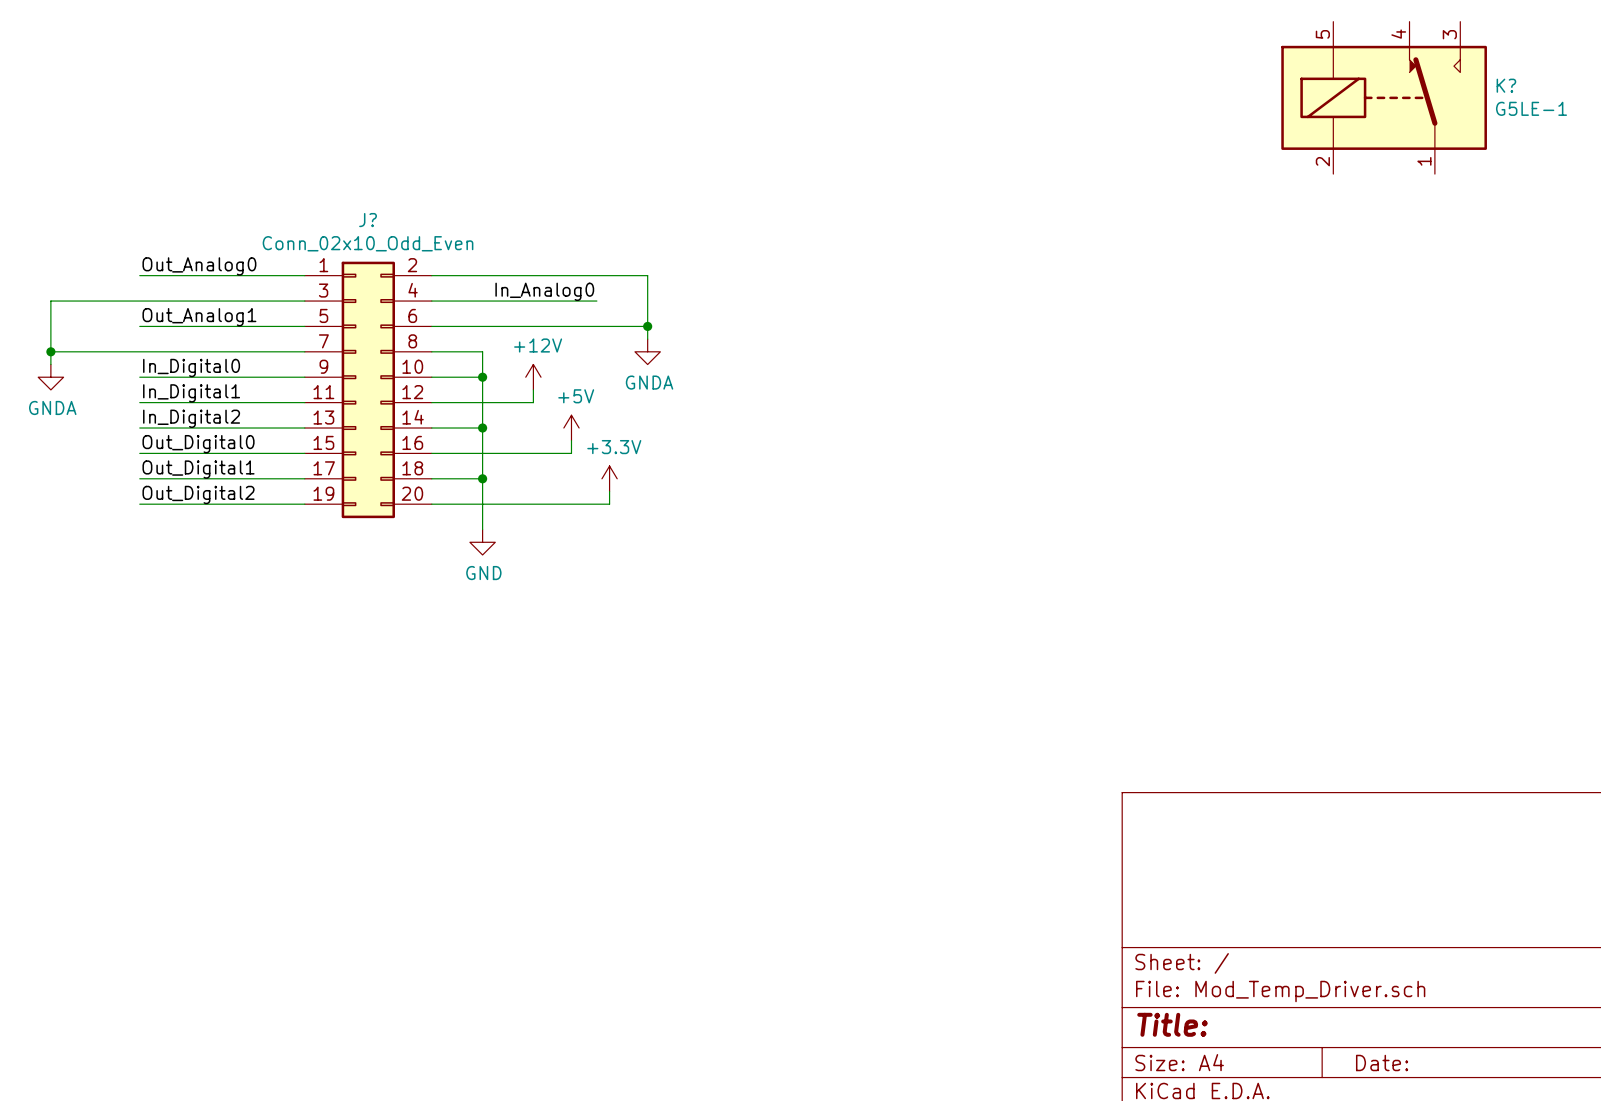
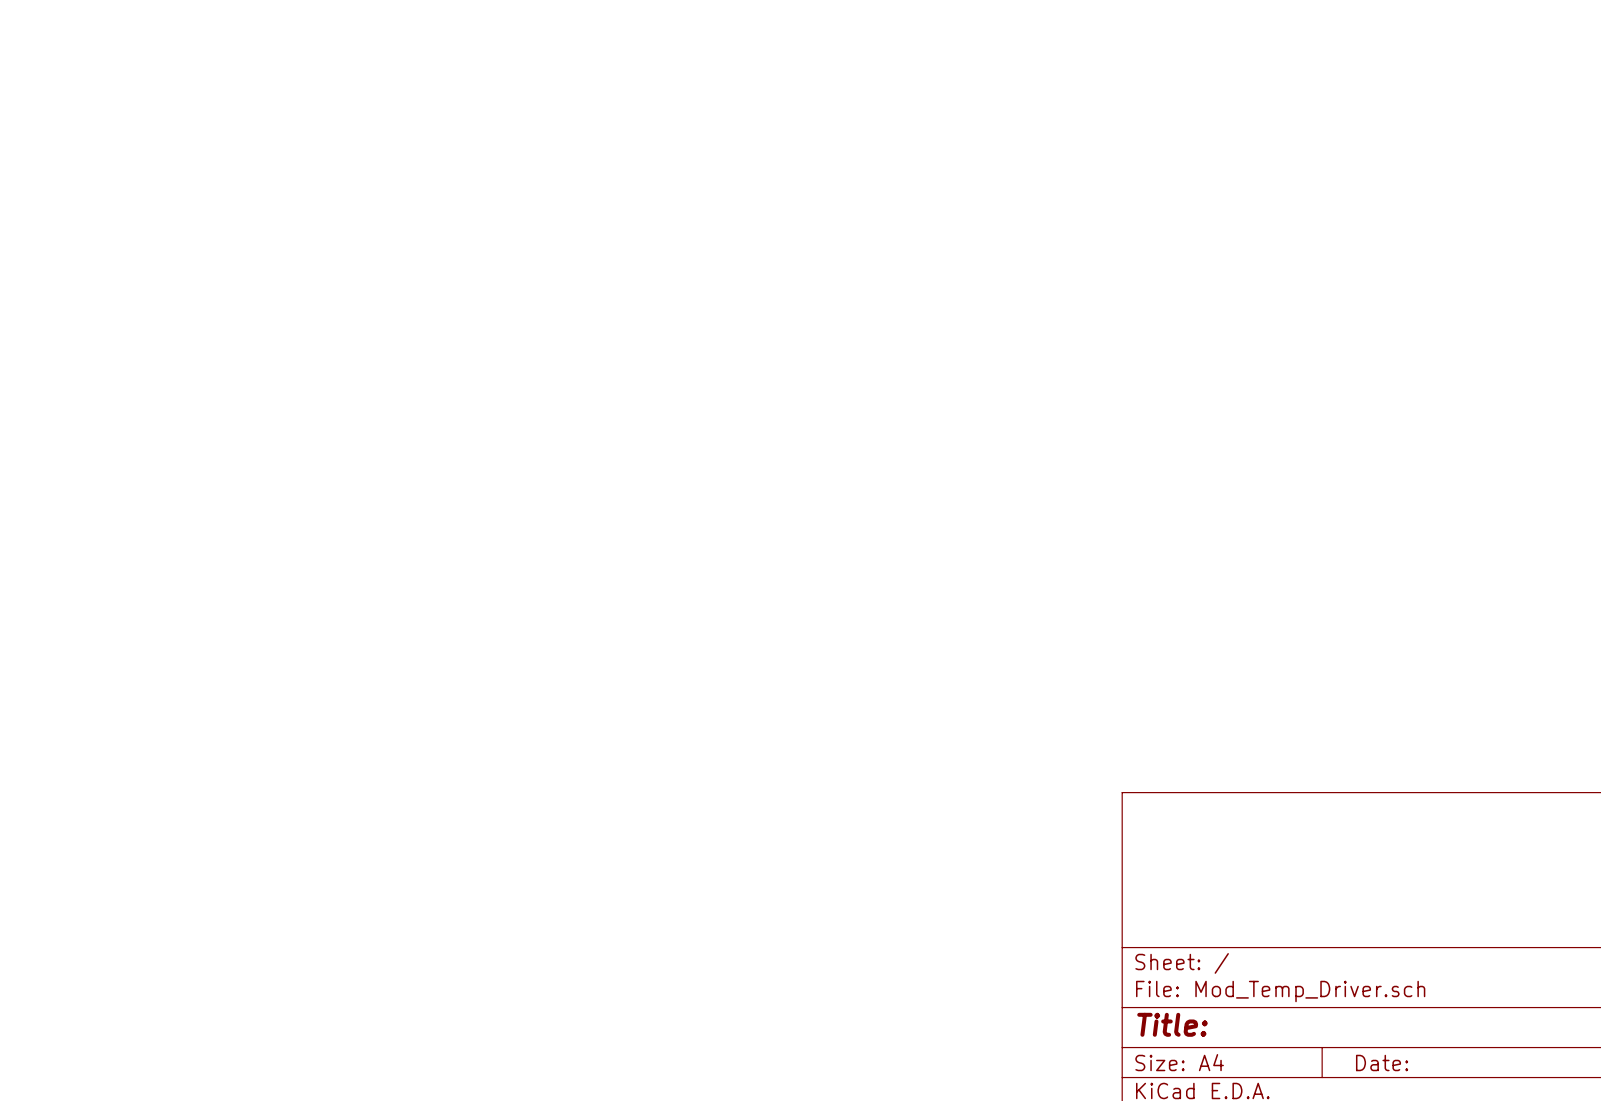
K?: G5LE-1 (1384, 97) -> none
label: Out_Analog0 (199, 266) -> none
wire: (139, 275) (304, 275) -> none
wire: (431, 275) (647, 275) (647, 339) -> none
label: In_Analog0 (544, 291) -> none
wire: (304, 301) (50, 301) (50, 364) -> none
wire: (431, 301) (596, 301) -> none
label: Out_Analog1 (199, 317) -> none
wire: (139, 326) (304, 326) -> none
wire: (431, 326) (647, 326) -> none
junction: (647, 326) -> none
wire: (50, 351) (304, 351) -> none
junction: (50, 351) -> none
wire: (431, 351) (482, 351) (482, 529) -> none
power symbol: GNDA (647, 351) -> none
label: In_Digital0 (191, 368) -> none
power symbol: GNDA (50, 377) -> none
wire: (139, 377) (304, 377) -> none
wire: (431, 377) (482, 377) -> none
junction: (482, 377) -> none
power symbol: +12V (533, 377) -> none
J?: Conn_02x10_Odd_Even (368, 389) -> none
wire: (533, 389) (533, 402) (431, 402) -> none
label: In_Digital1 (191, 393) -> none
wire: (139, 402) (304, 402) -> none
label: In_Digital2 (191, 418) -> none
wire: (139, 428) (304, 428) -> none
wire: (431, 428) (482, 428) -> none
junction: (482, 428) -> none
power symbol: +5V (571, 428) -> none
wire: (571, 440) (571, 453) (431, 453) -> none
label: Out_Digital0 (198, 444) -> none
wire: (139, 453) (304, 453) -> none
label: Out_Digital1 (198, 469) -> none
wire: (139, 478) (304, 478) -> none
wire: (431, 478) (482, 478) -> none
junction: (482, 478) -> none
power symbol: +3.3V (609, 478) -> none
wire: (609, 491) (609, 504) (431, 504) -> none
label: Out_Digital2 (198, 494) -> none
wire: (139, 504) (304, 504) -> none
power symbol: GND (482, 542) -> none

